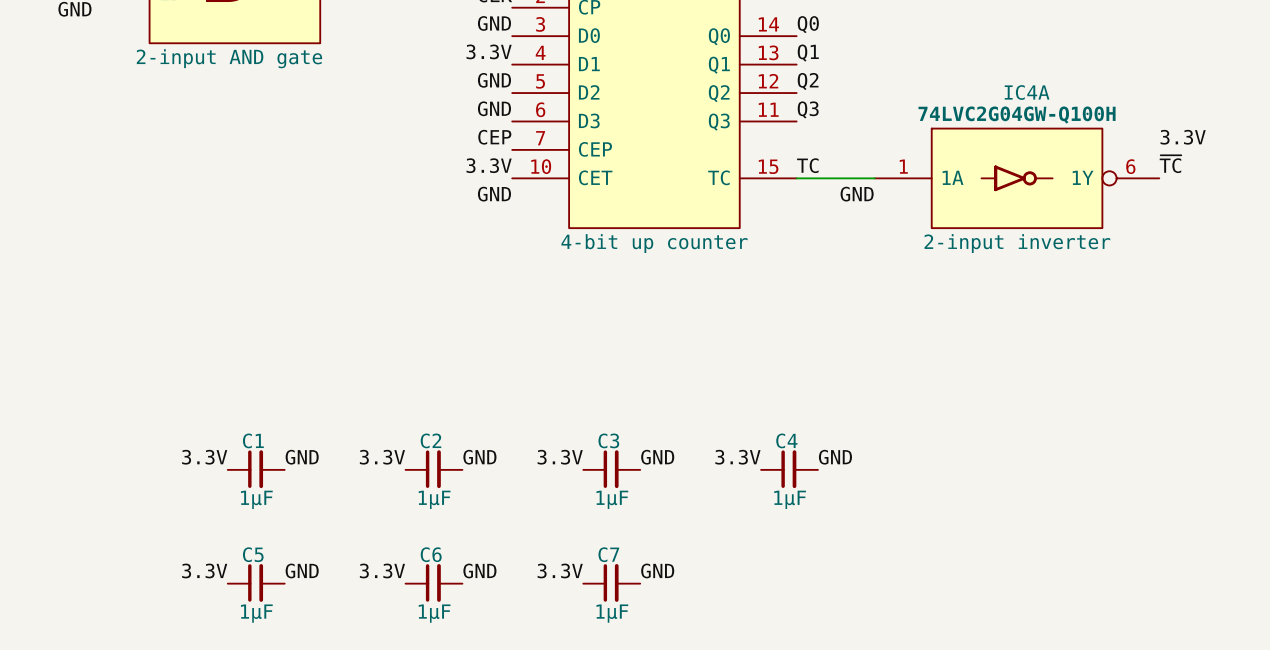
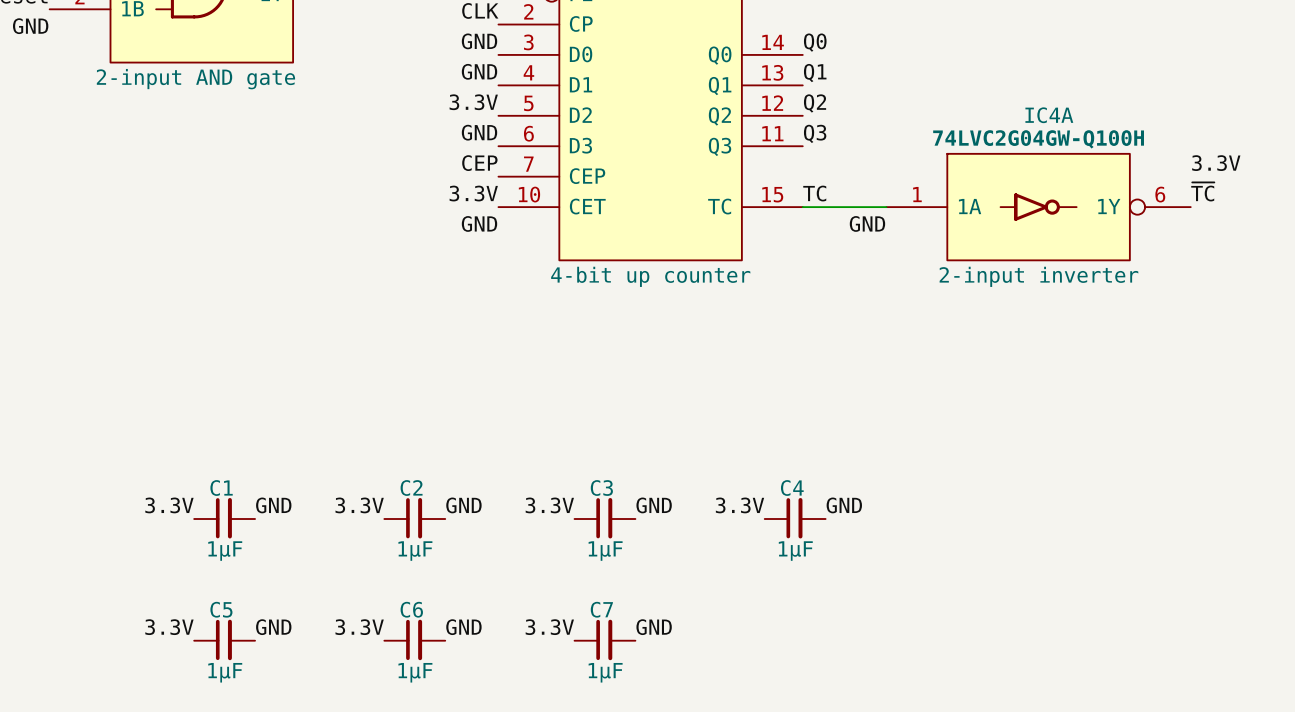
label: 3.3V (489, 51) -> GND (479, 71)
label: GND (494, 80) -> 3.3V (473, 102)

